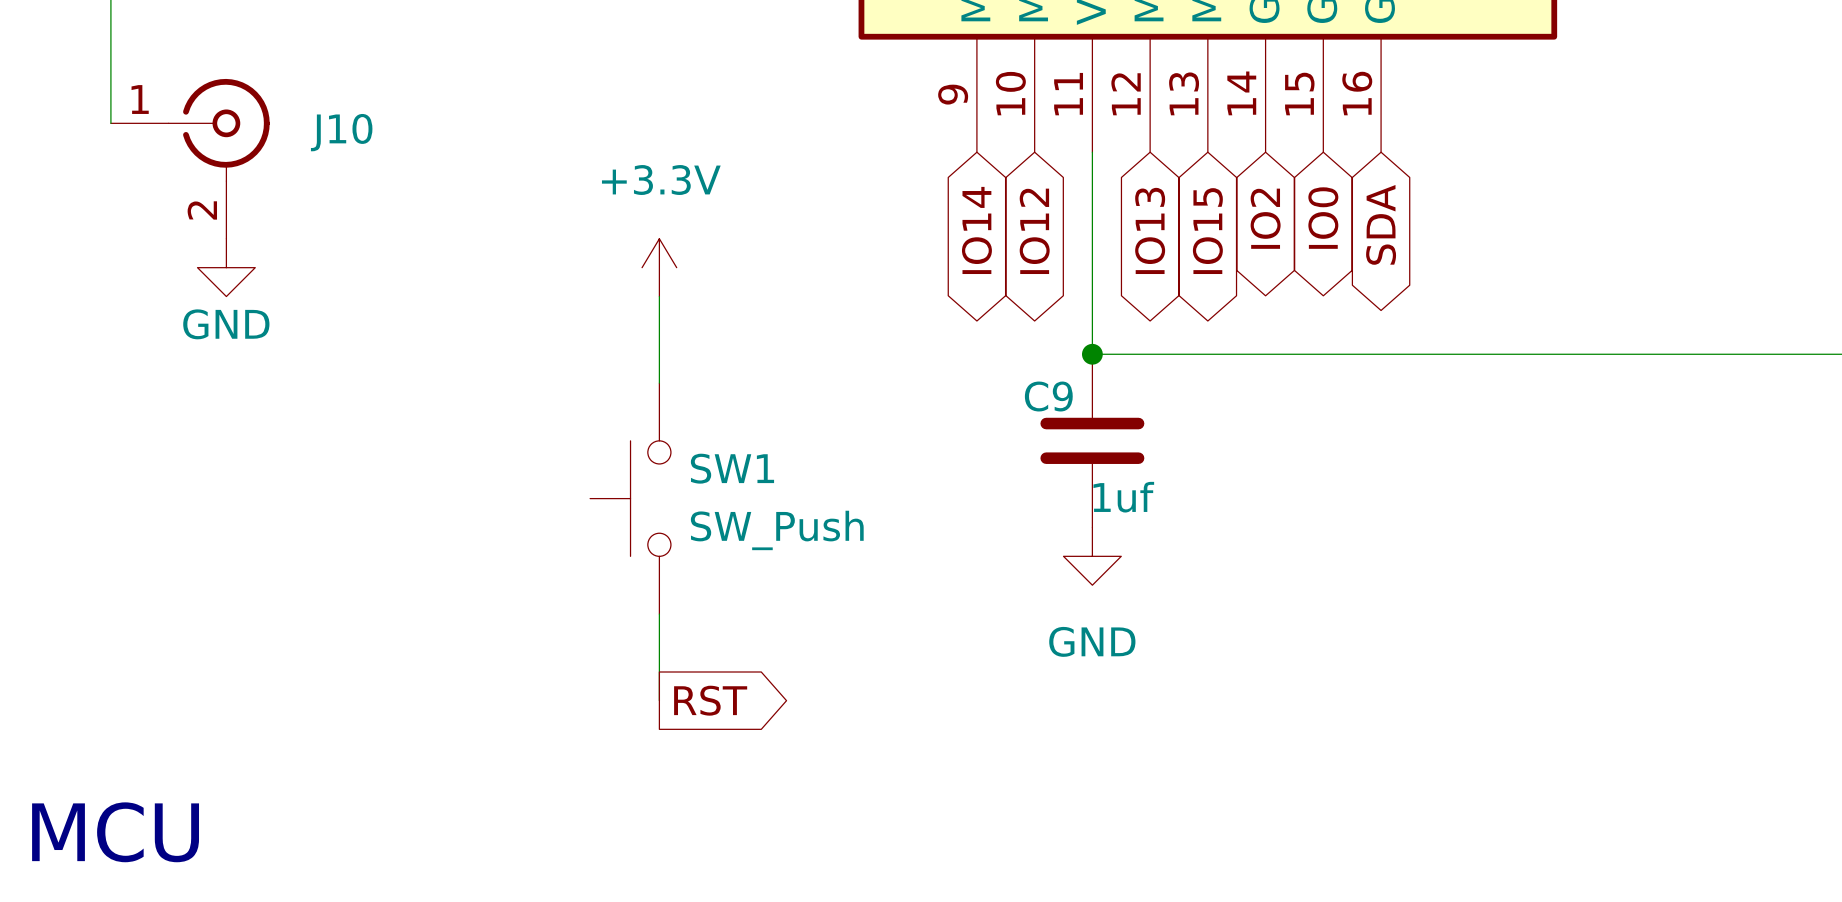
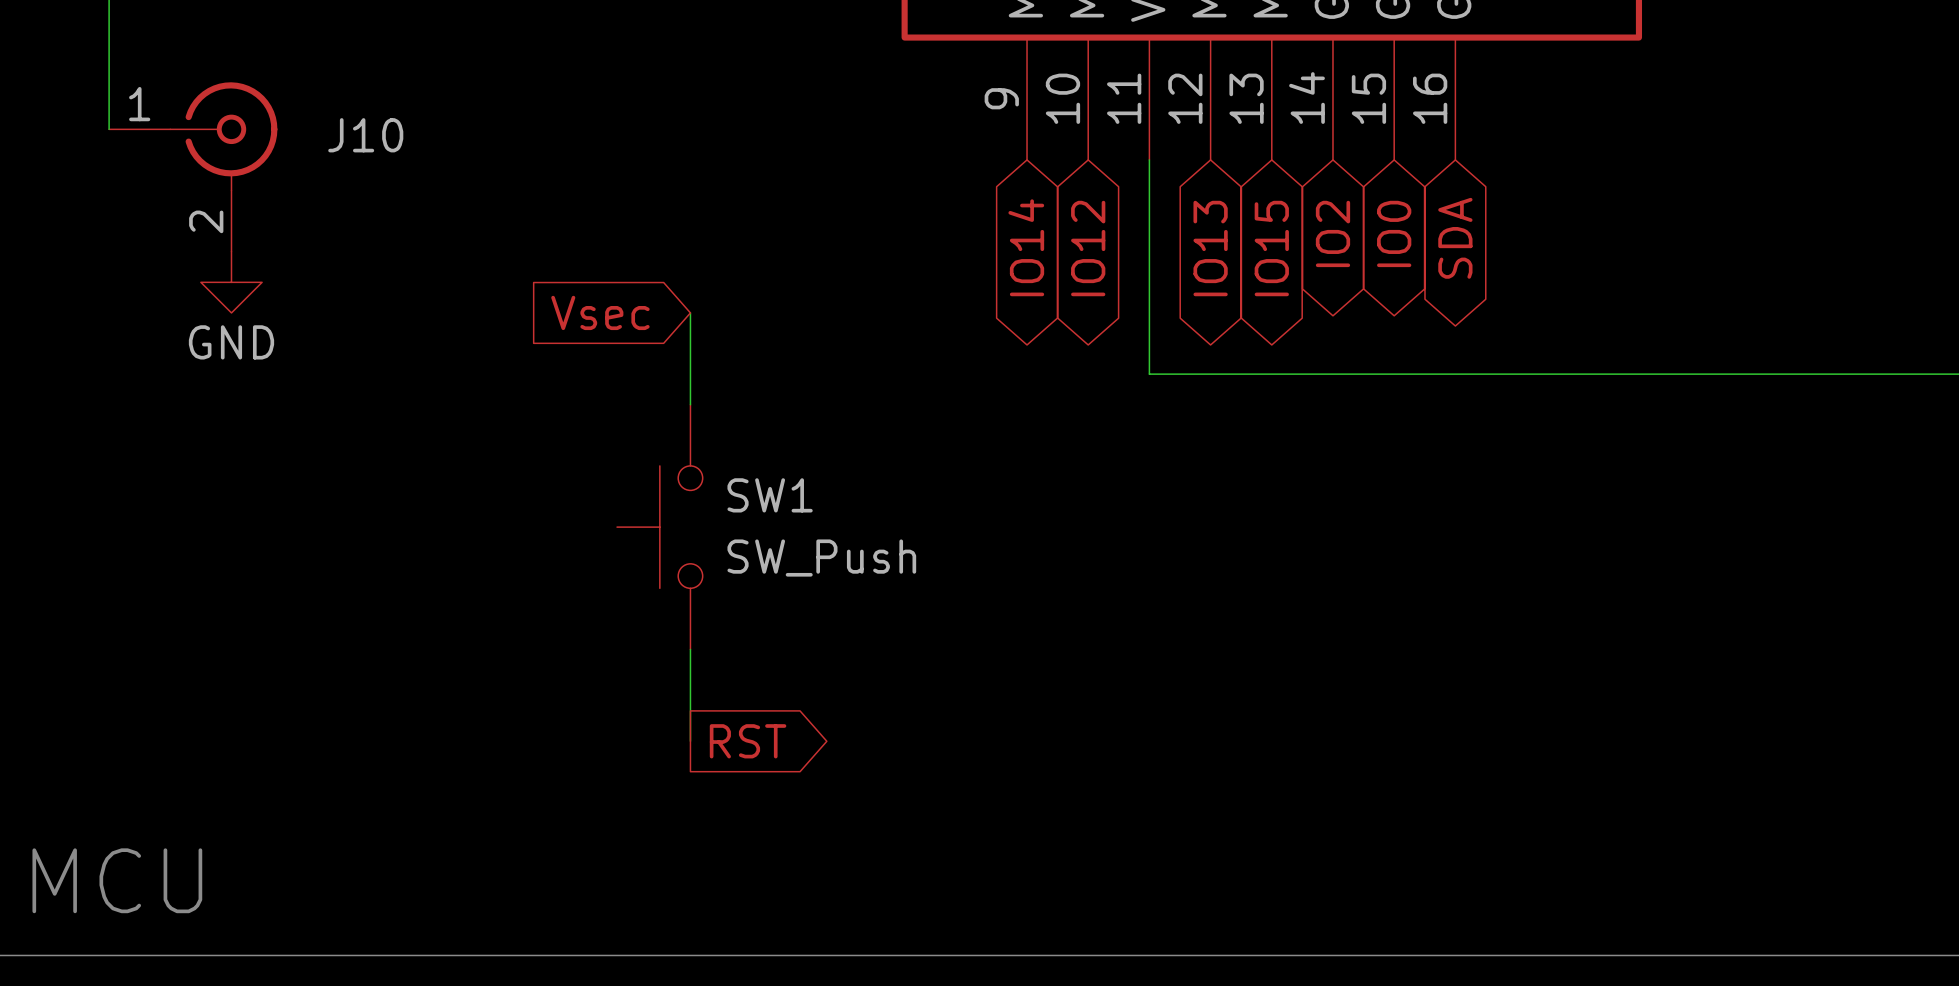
power symbol: +3.3V (659, 267) -> none
global label: none -> Vsec (600, 312)
junction: (1092, 354) -> none
C9: 1uf (1092, 440) -> none
power symbol: GND (1092, 556) -> none

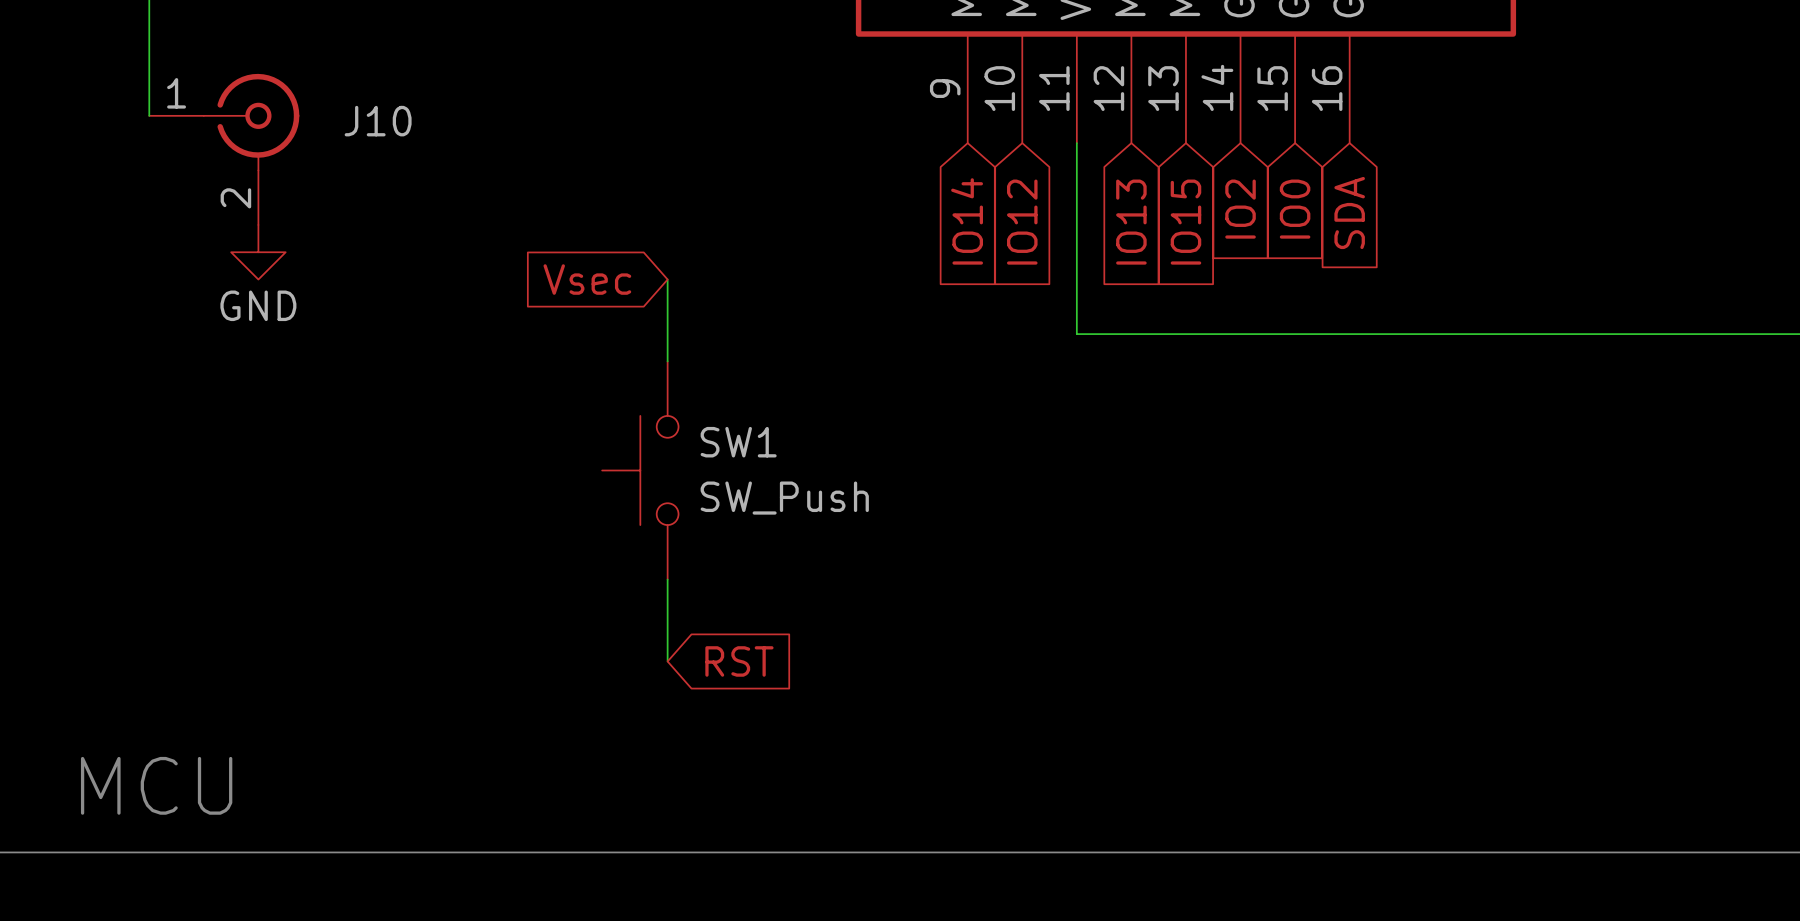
global label shape: bidirectional (1332, 233) -> input (1240, 209)
global label shape: bidirectional (1394, 233) -> input (1295, 209)
global label shape: bidirectional (1455, 238) -> input (1349, 212)
global label shape: bidirectional (1026, 247) -> input (967, 221)
global label shape: bidirectional (1088, 248) -> input (1022, 222)
global label shape: bidirectional (1210, 248) -> input (1131, 222)
global label shape: bidirectional (1271, 248) -> input (1185, 222)
global label shape: output (748, 741) -> input (739, 661)

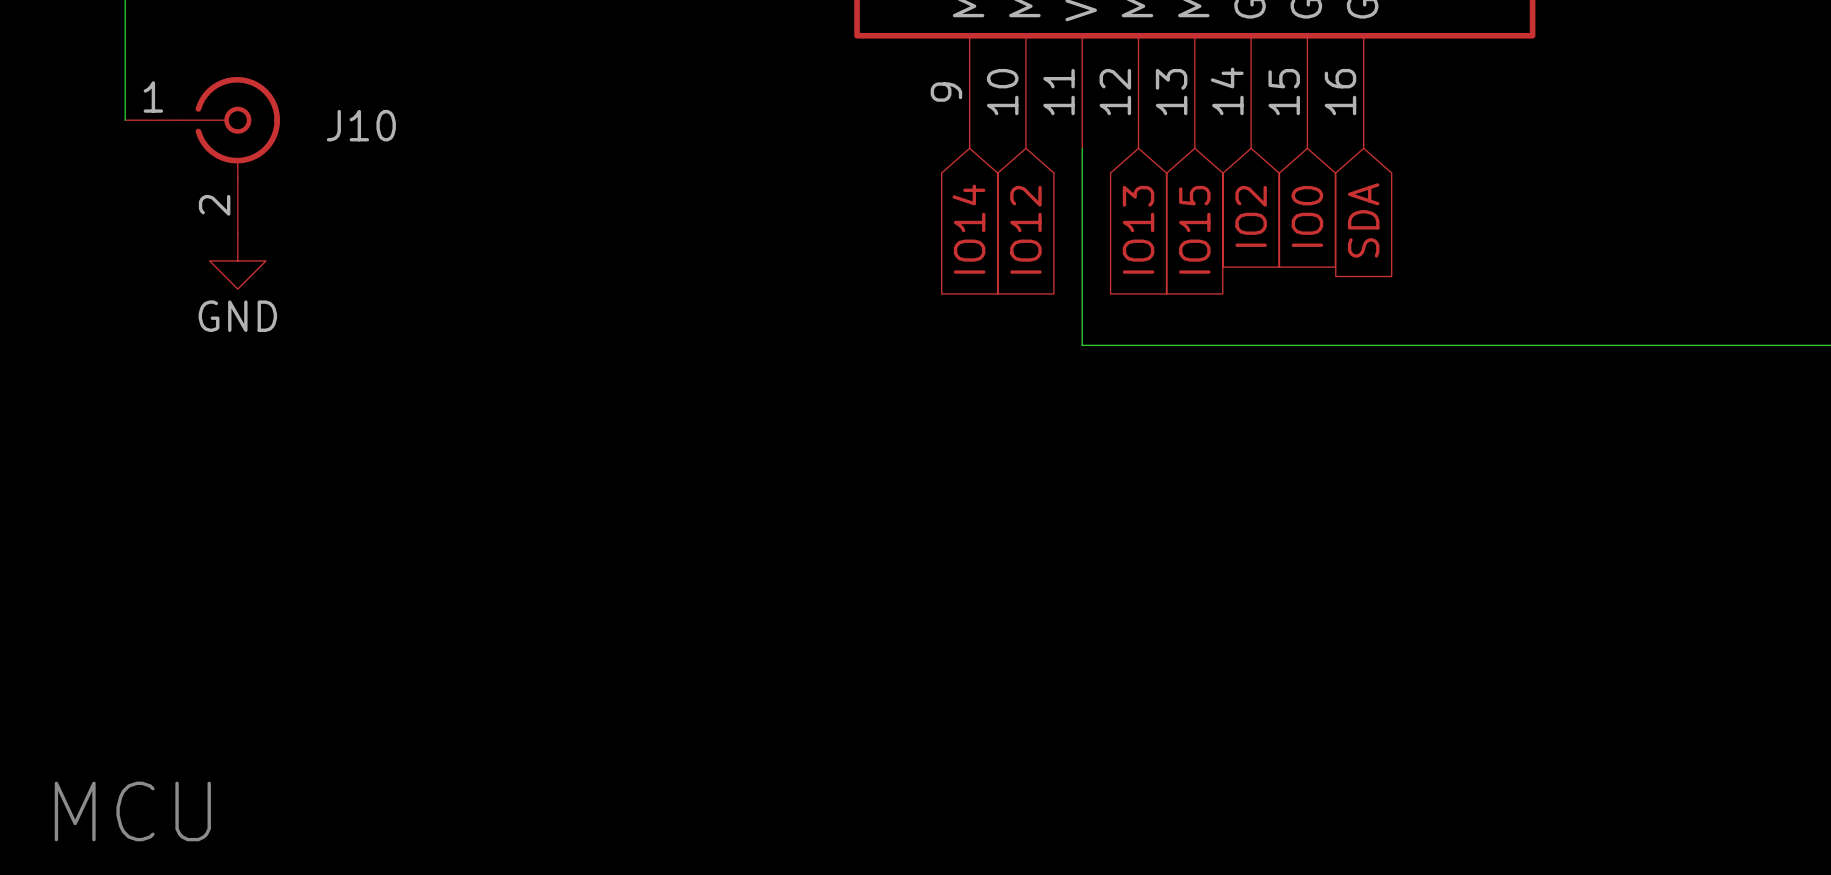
global label: Vsec (587, 279) -> none
wire: (667, 279) (667, 361) -> none
SW1: SW_Push (640, 470) -> none
wire: (667, 579) (667, 661) -> none
global label: RST (739, 661) -> none

